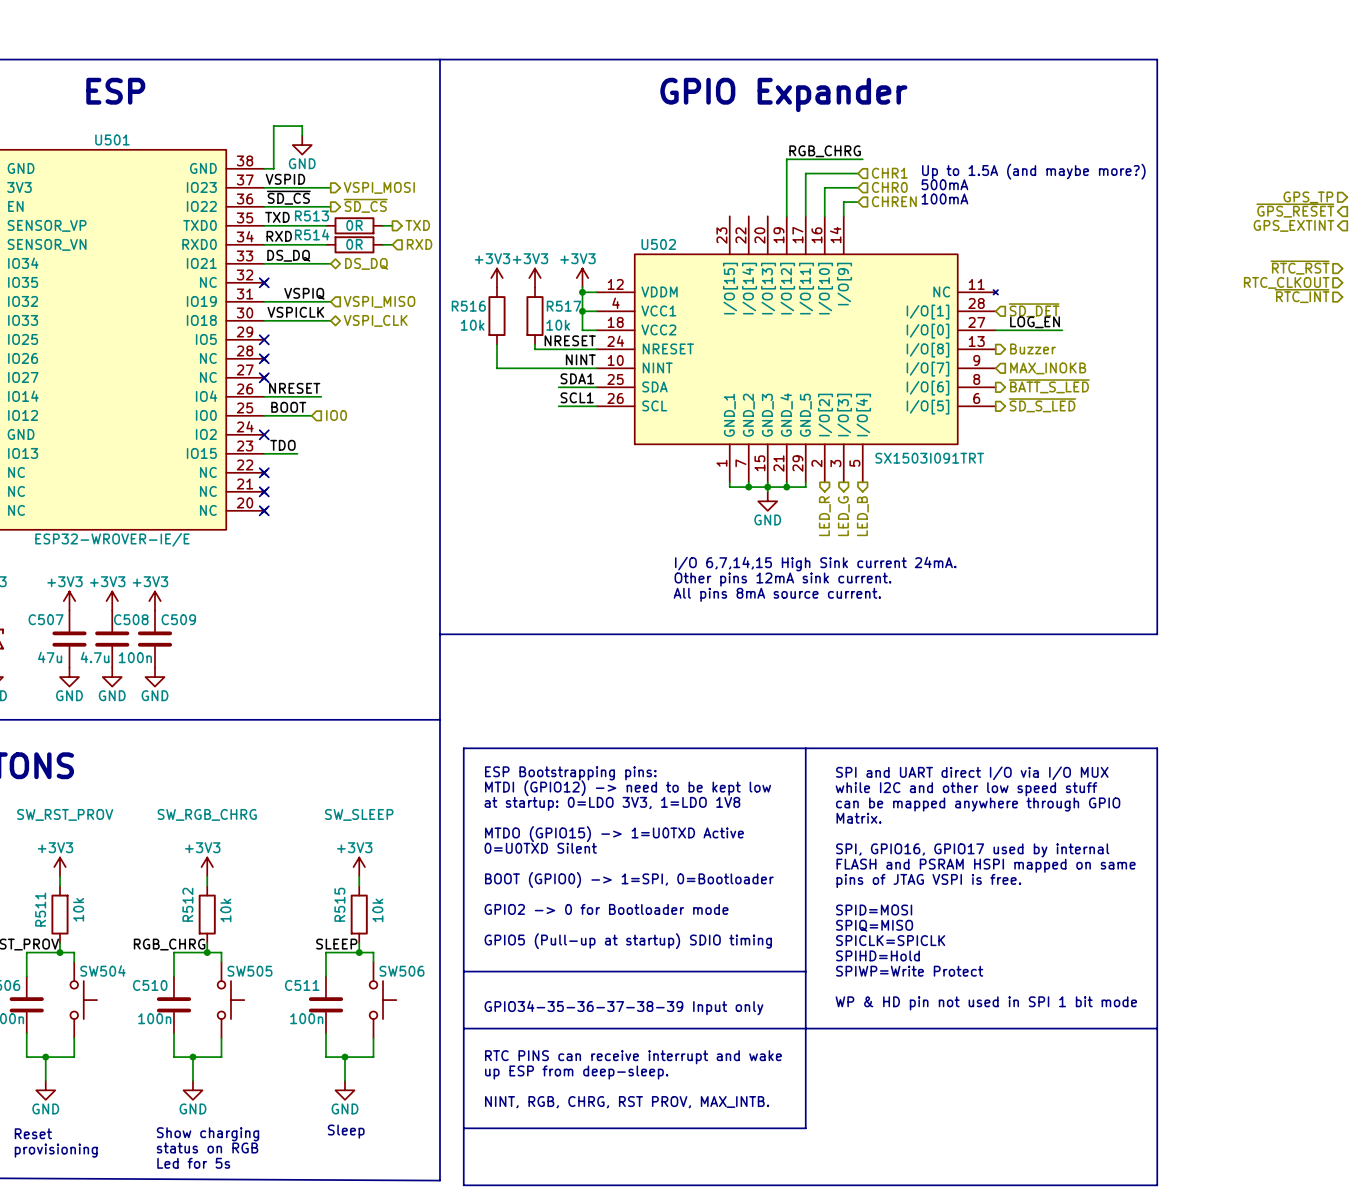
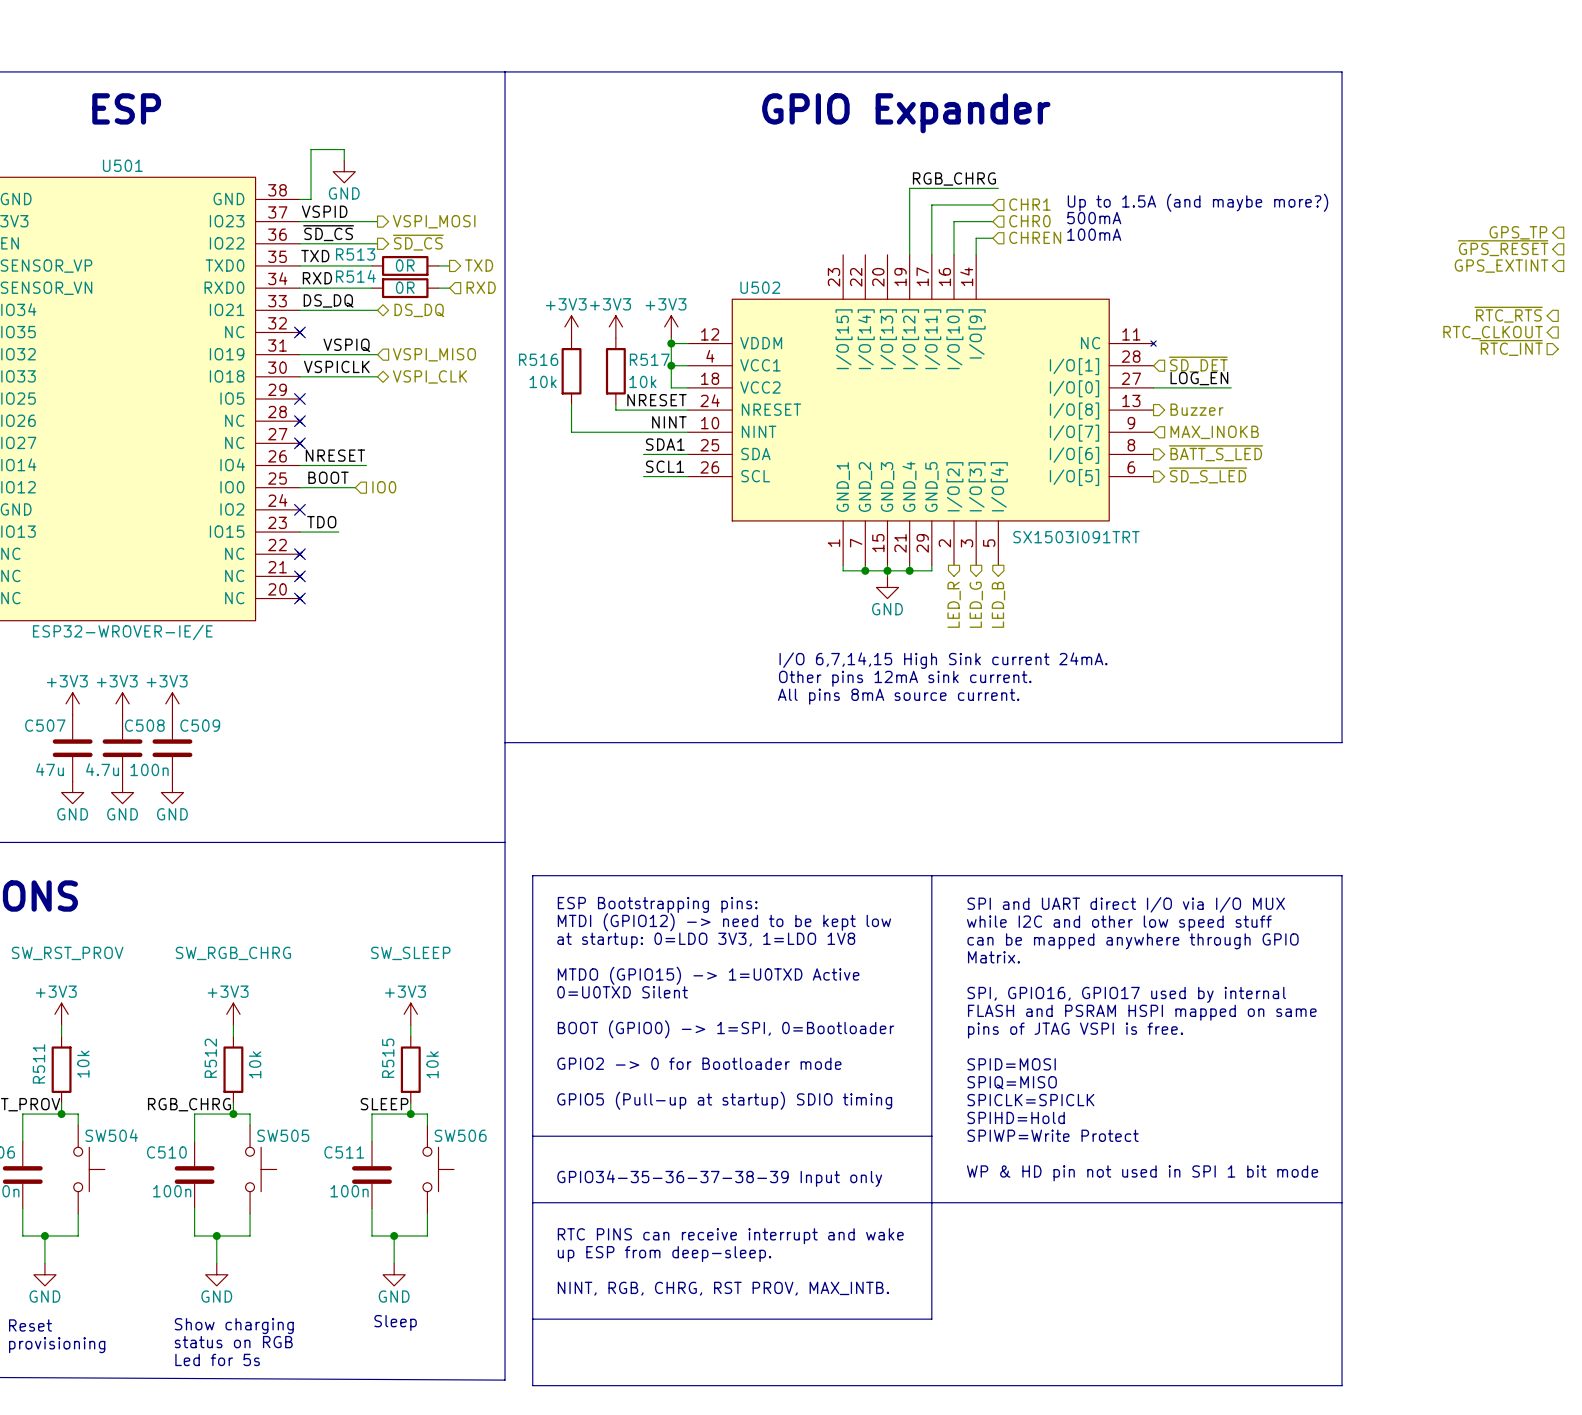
hierarchical label shape: input (1308, 197) -> output (1518, 232)
hierarchical label shape: input (1300, 267) -> output (1508, 314)
hierarchical label: ~{RTC_RST} (1300, 267) -> ~{RTC_RTS} (1508, 314)
hierarchical label shape: input (1286, 282) -> output (1493, 332)

